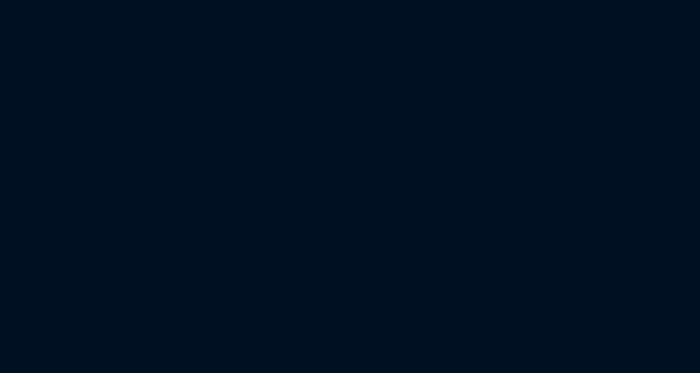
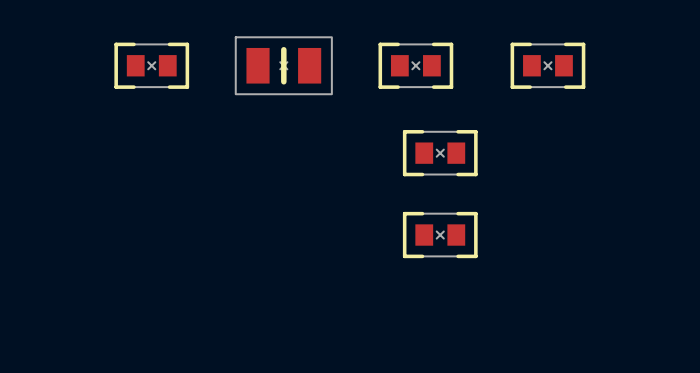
part: none -> (151, 65)
part: none -> (283, 65)
part: none -> (415, 65)
part: none -> (547, 65)
part: none -> (440, 153)
part: none -> (440, 235)

